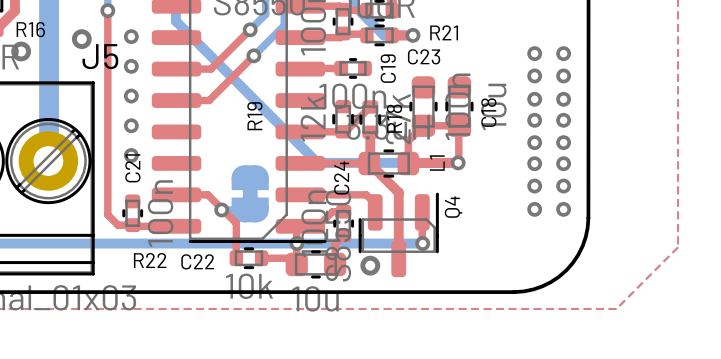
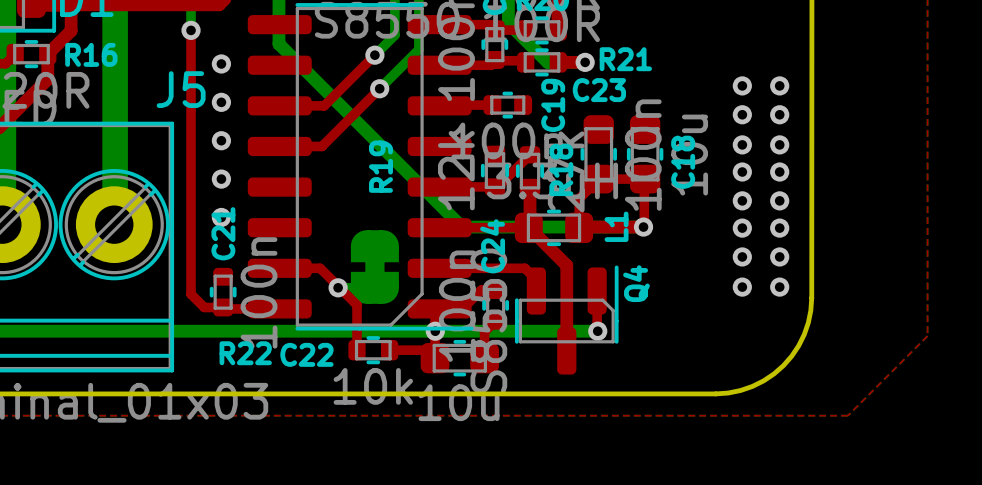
via: (81, 39) -> none
via: (21, 51) -> none
via: (370, 265) -> none

